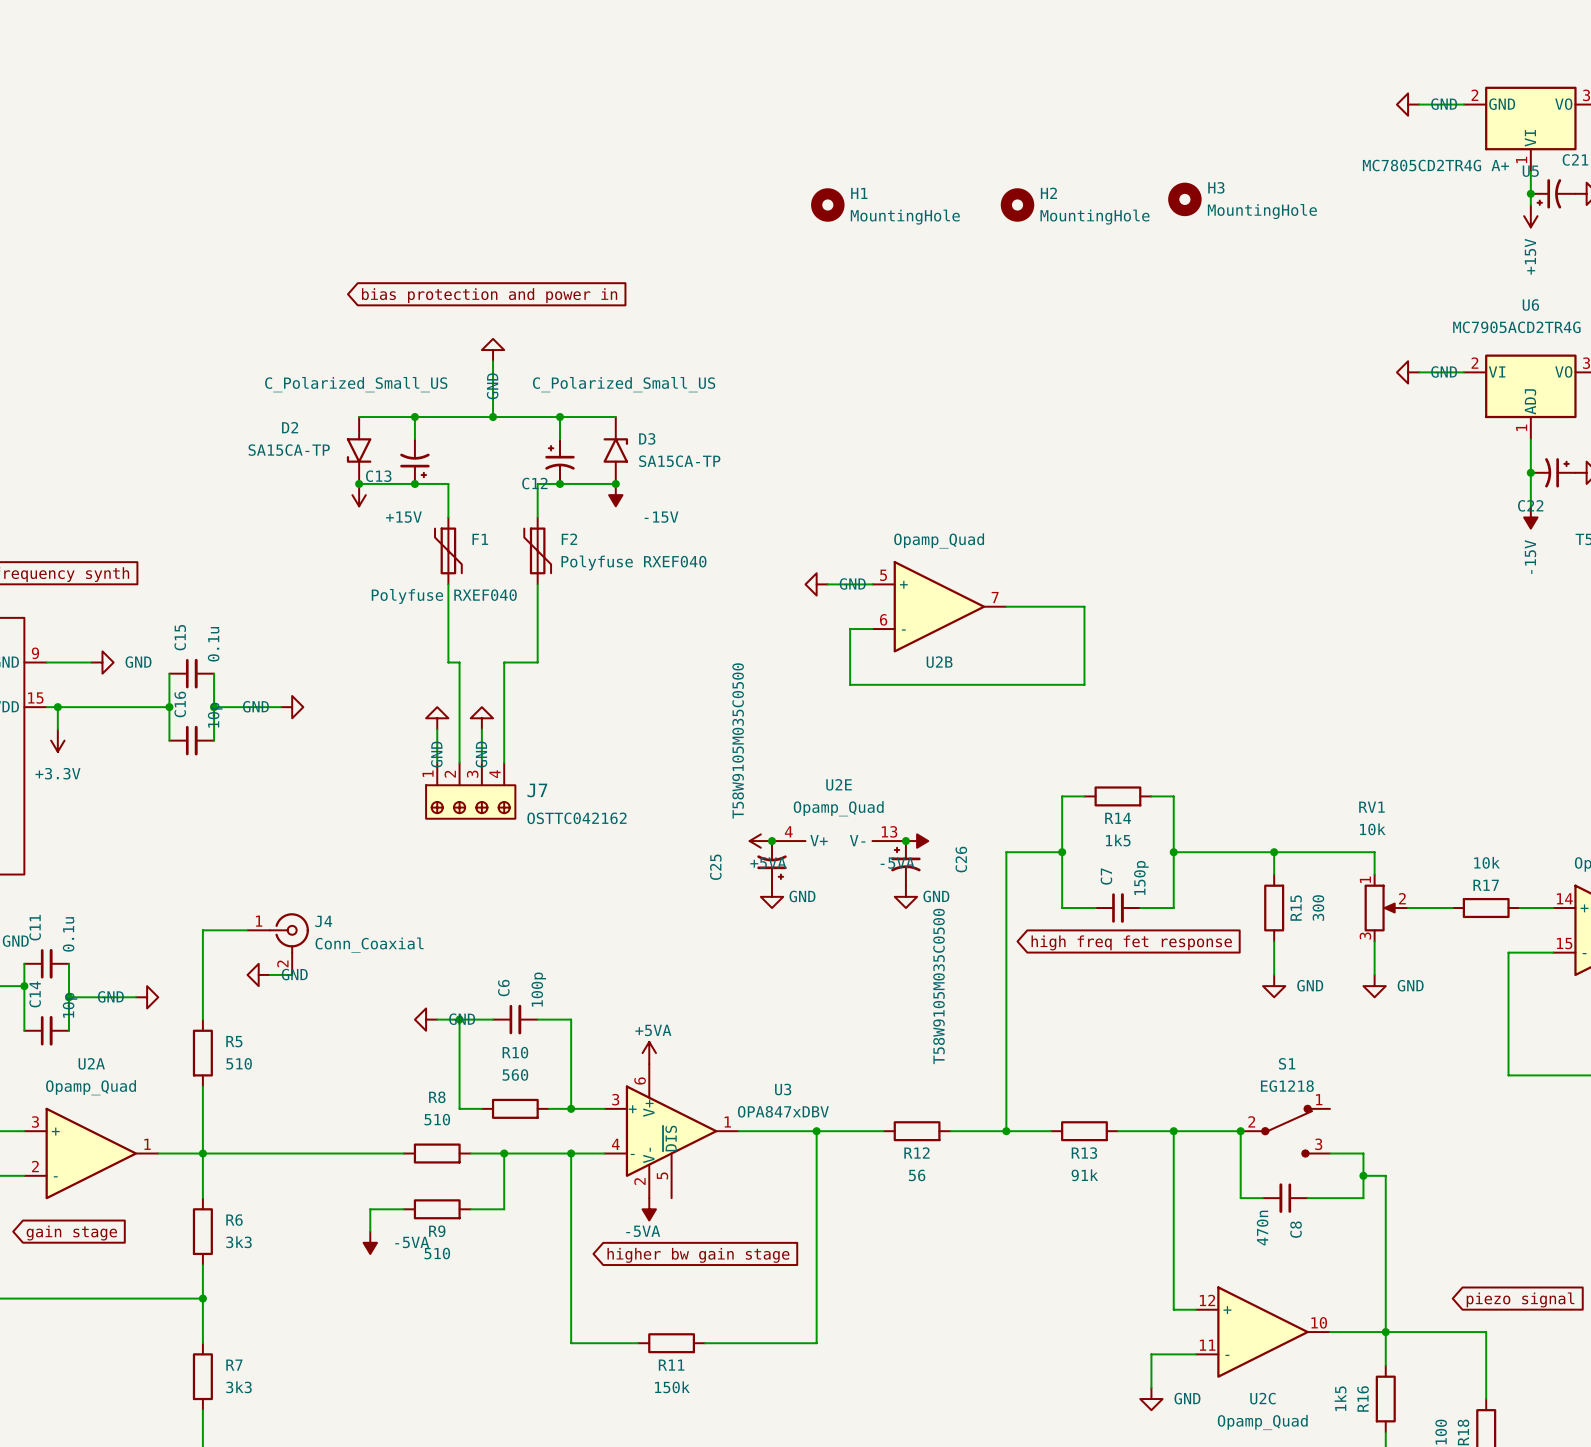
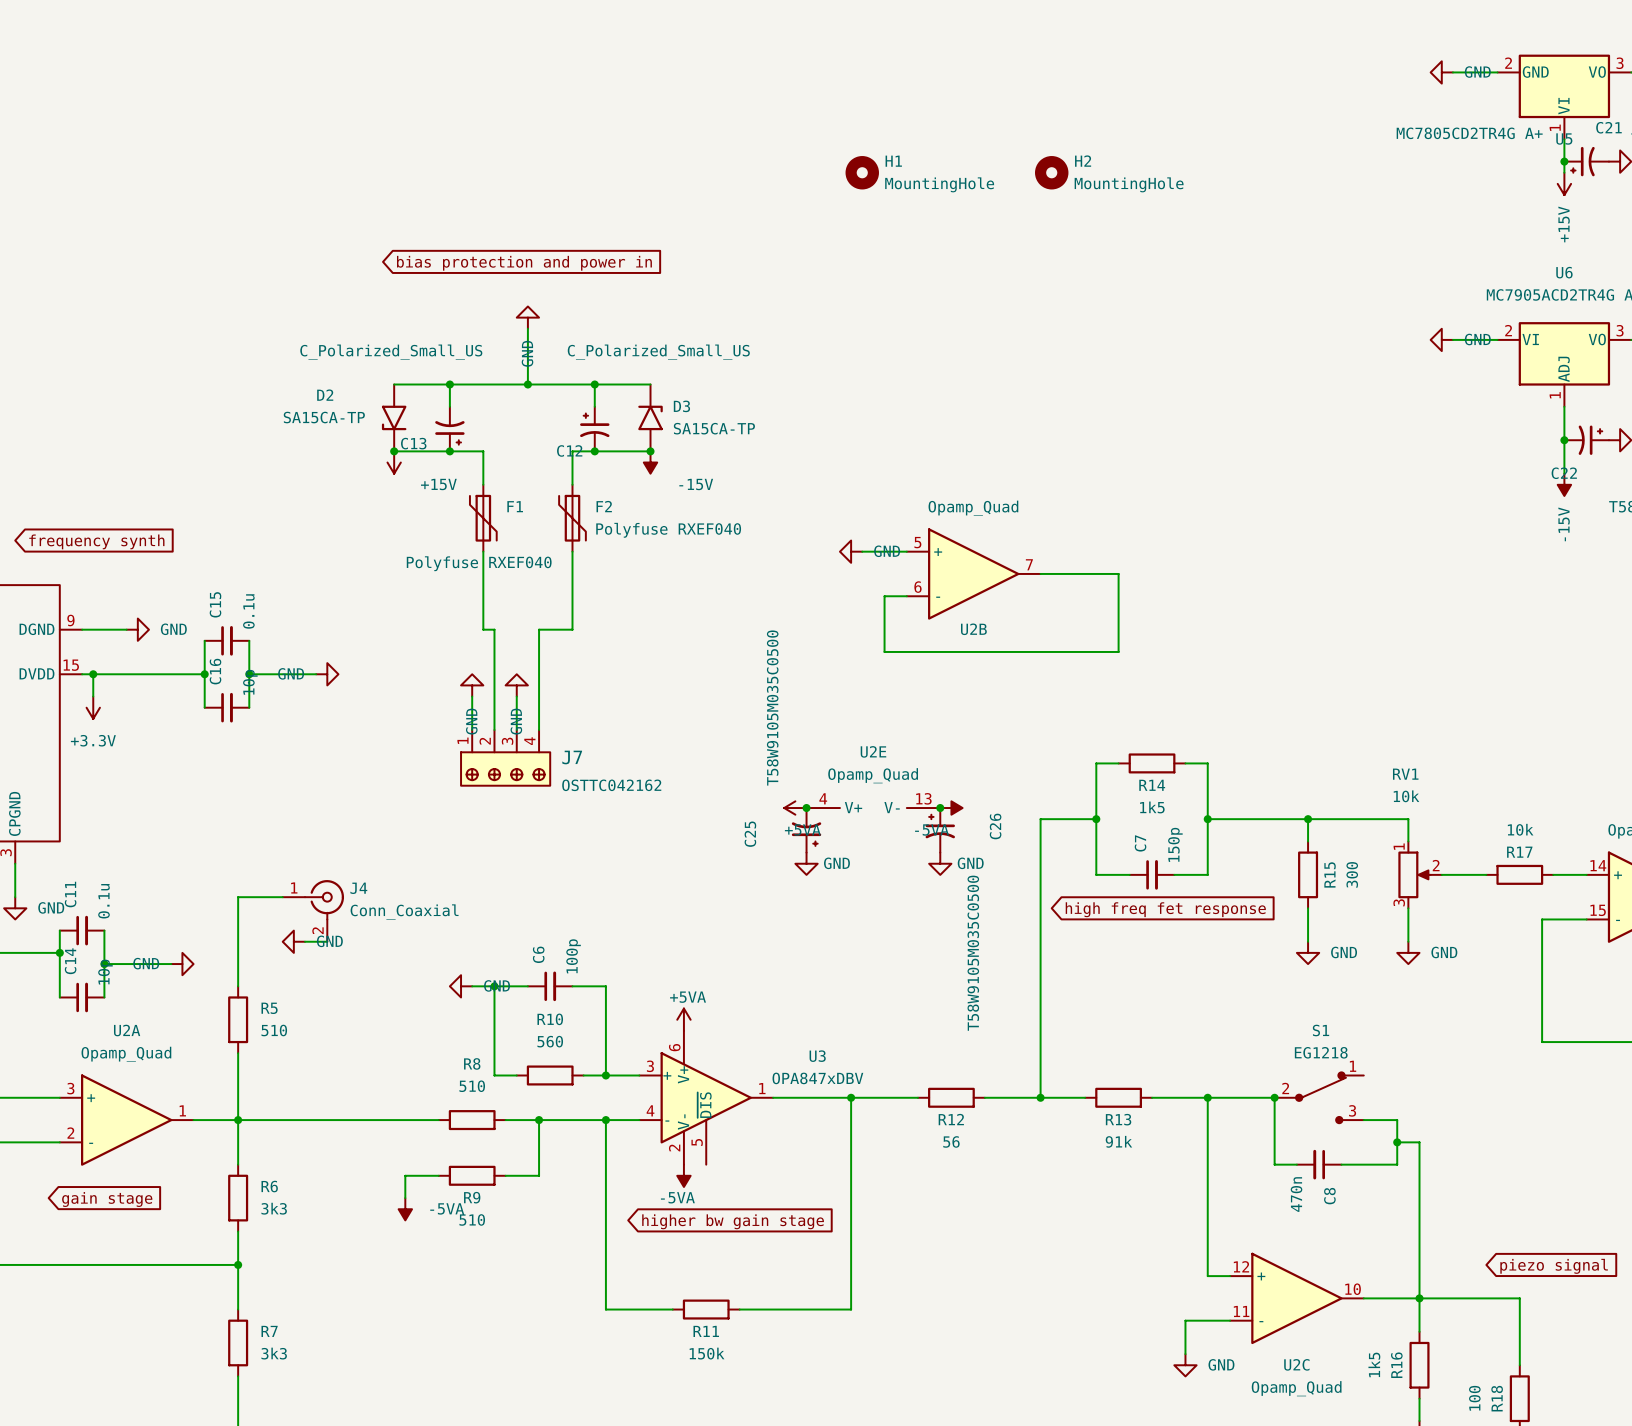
H3: MountingHole (1184, 199) -> none

